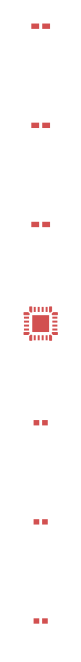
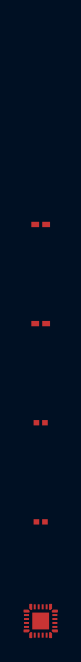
part: (40, 26) -> none
part: (40, 125) -> none
part footprint: [23, 306, 58, 341] -> [31, 320, 51, 327]
part footprint: [33, 618, 48, 624] -> [23, 603, 58, 639]

